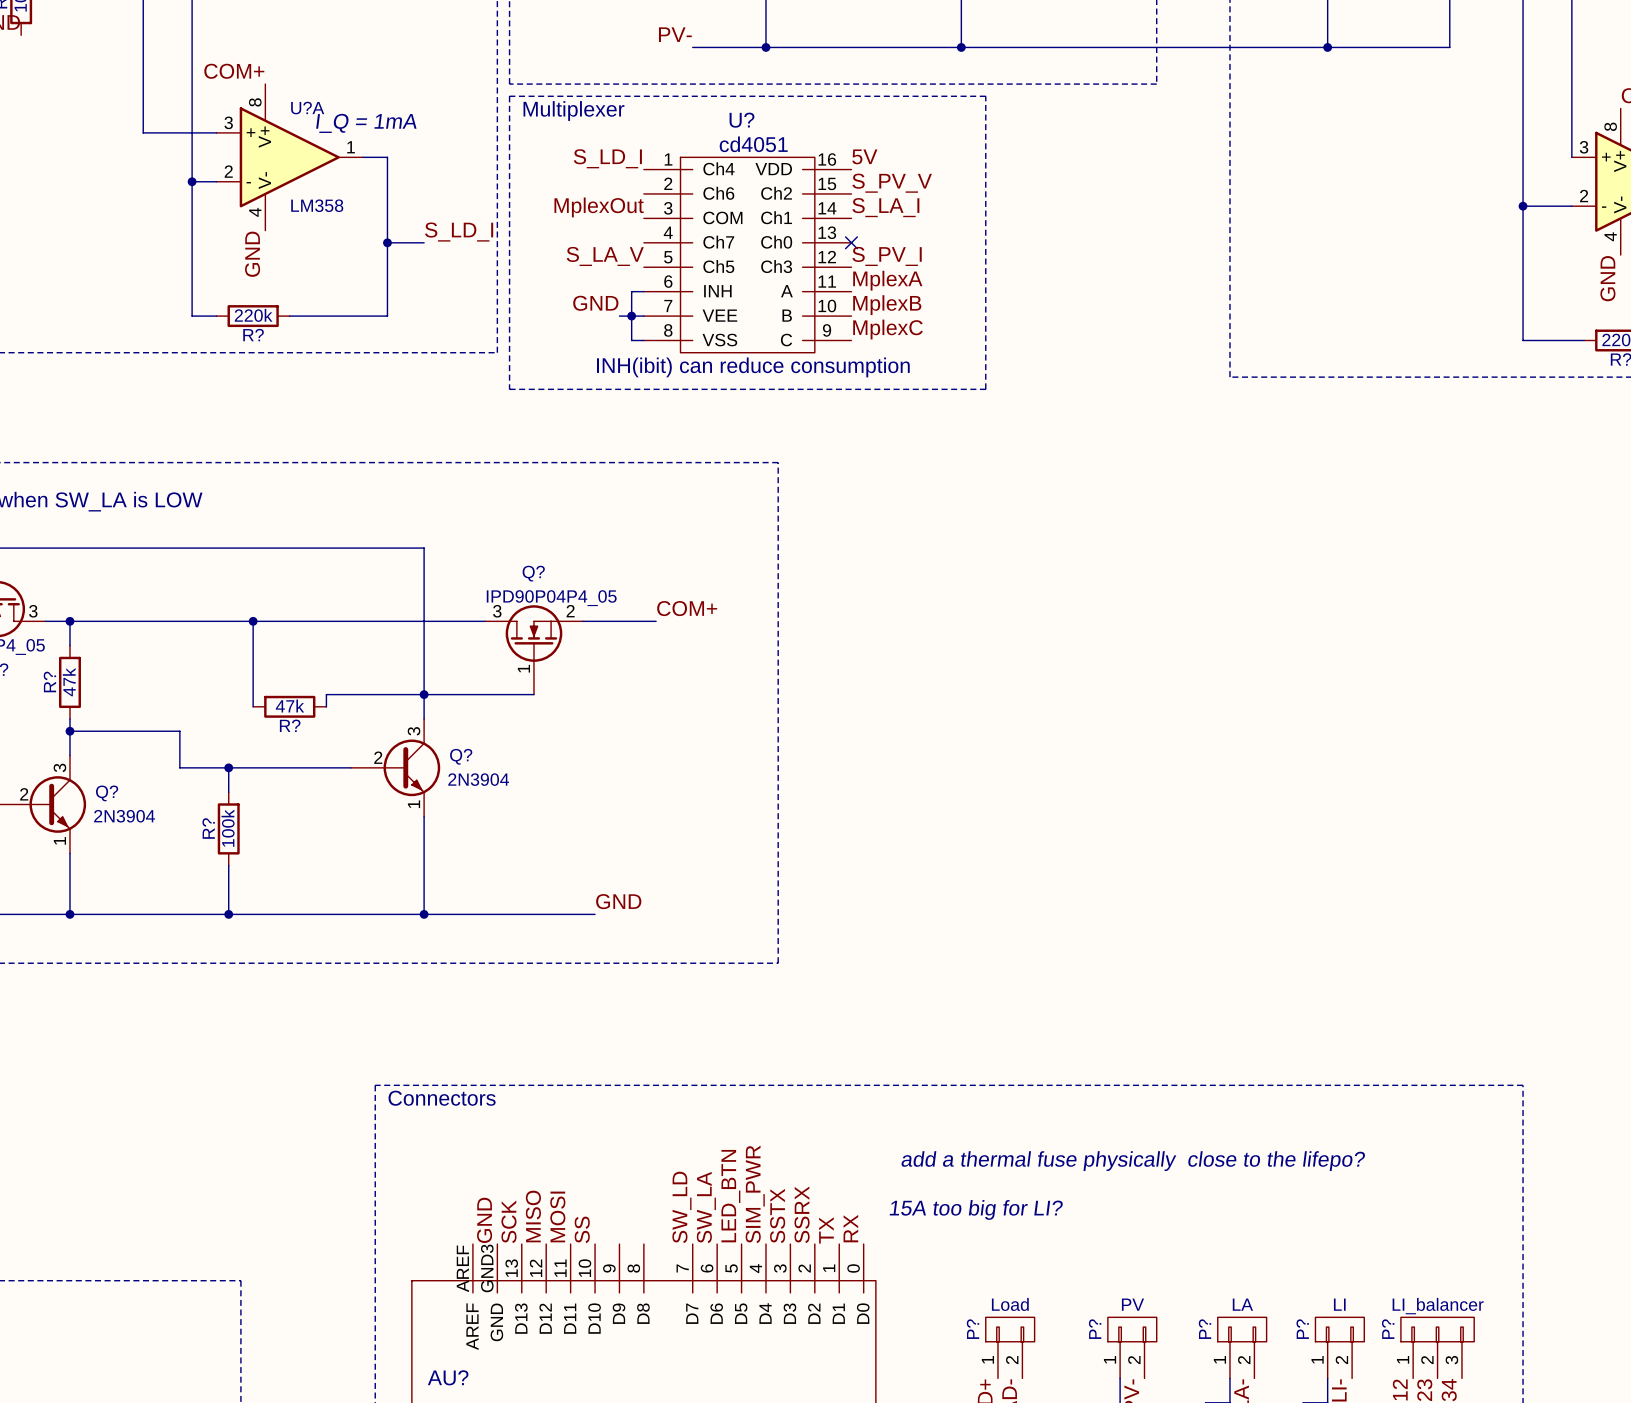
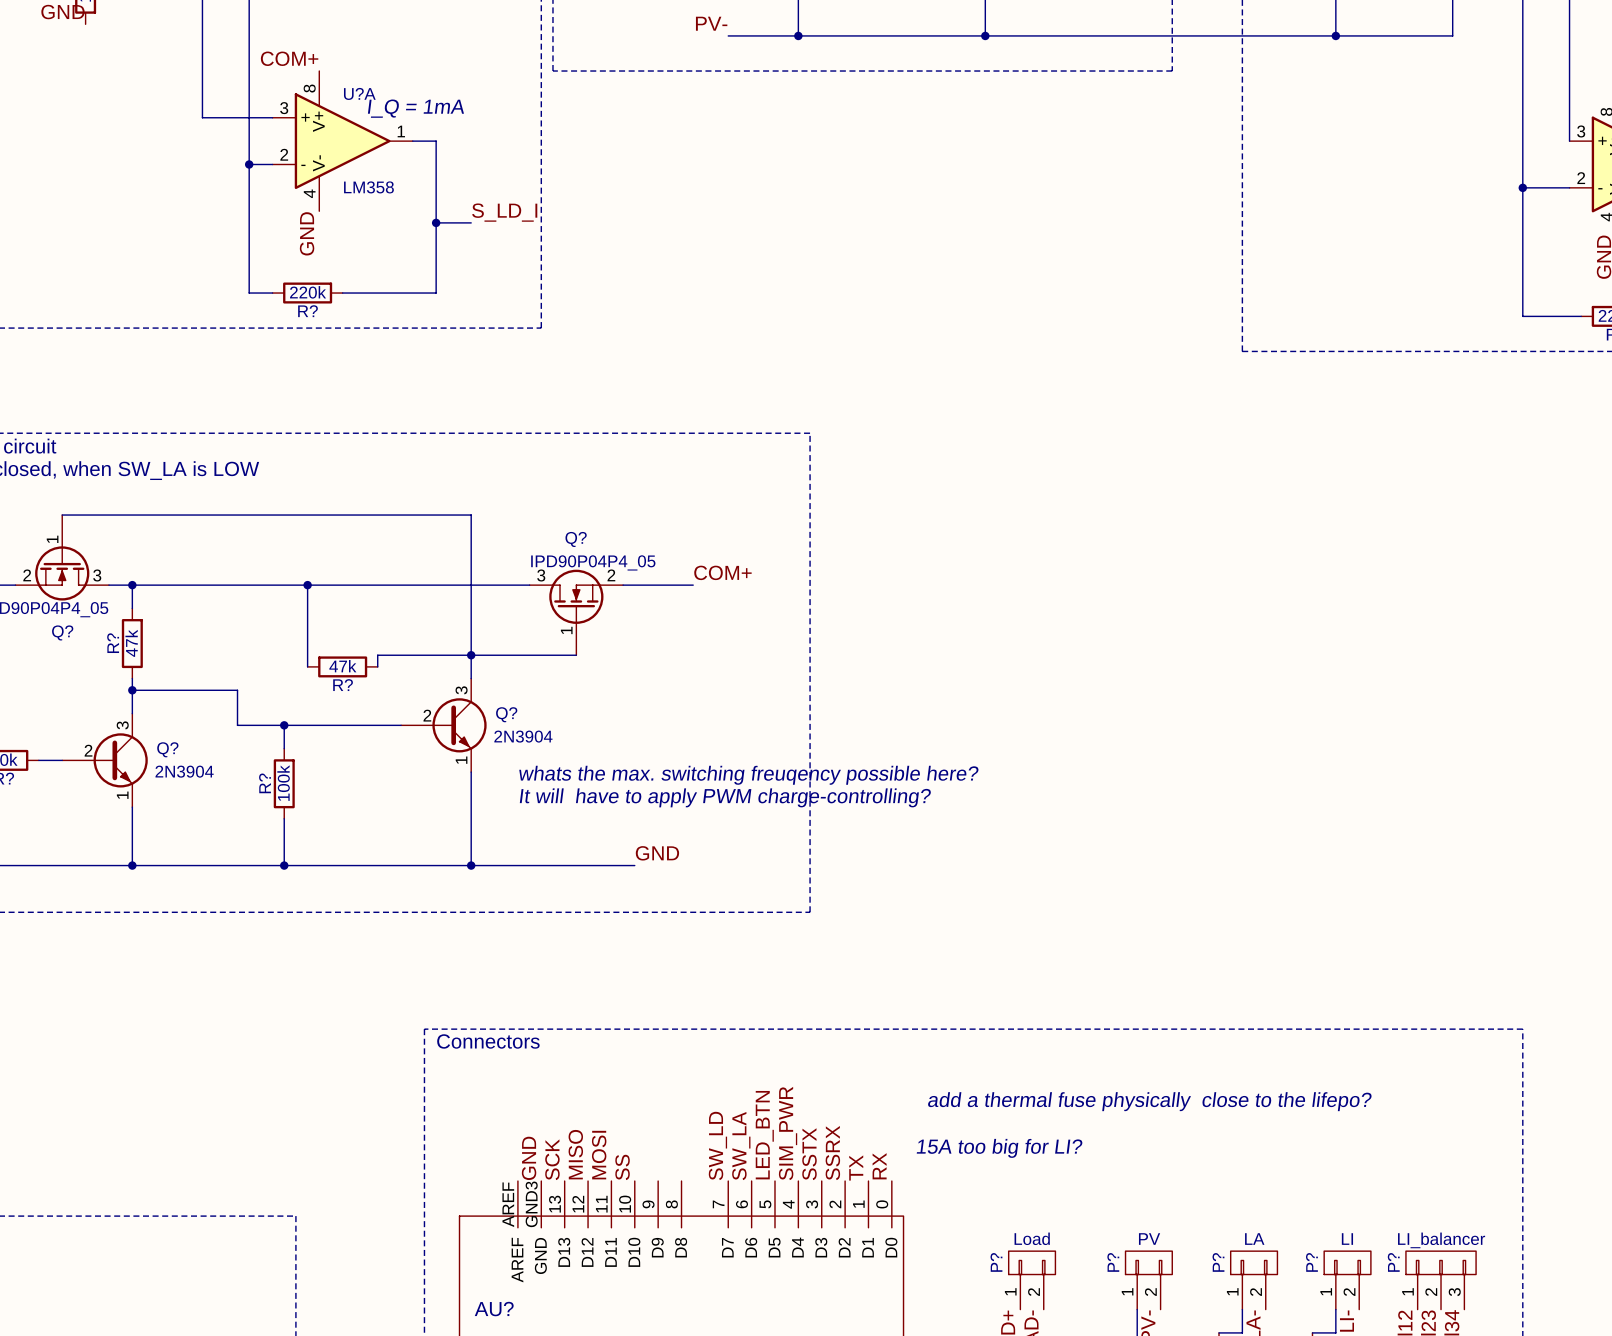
line: (509, 96) (509, 389) (985, 389) (985, 96) (509, 96) -> none
text: Multiplexer (573, 111) -> none
label: 5V (864, 156) -> none
label: S_LD_I (607, 158) -> none
label: S_PV_V (892, 183) -> none
label: MplexOut (599, 207) -> none
label: S_LA_I (885, 207) -> none
no-connect mark: (851, 242) -> none
U?: cd4051 (747, 255) -> none
label: S_LA_V (605, 256) -> none
label: S_PV_I (887, 256) -> none
label: MplexA (887, 280) -> none
wire: (643, 291) (631, 291) (631, 340) (643, 340) -> none
label: GND (595, 303) -> none
label: MplexB (887, 305) -> none
wire: (619, 316) (643, 316) -> none
junction: (631, 316) -> none
label: MplexC (888, 329) -> none
text: INH(ibit) can reduce consumption (753, 367) -> none
text: none -> whats the max. switching freuqency possible here? (748, 775)
text: none -> It will have to apply PWM charge-controlling? (725, 797)

